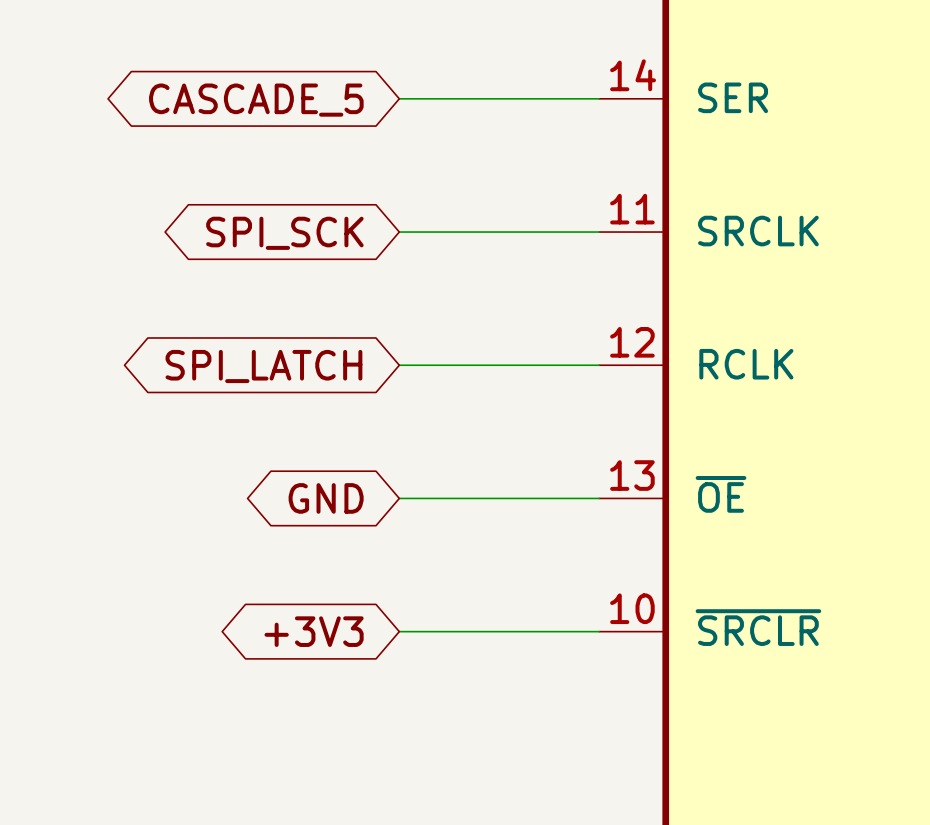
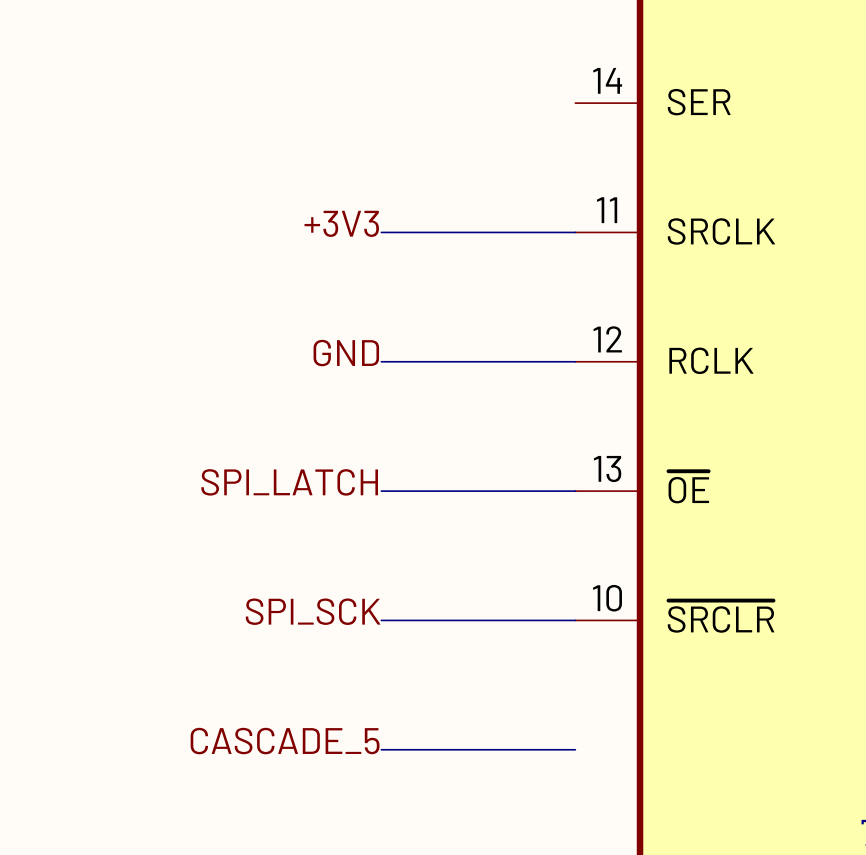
wire: (399, 98) (599, 98) -> none
global label: CASCADE_5 (256, 100) -> none
label: none -> +3V3 (341, 223)
global label: SPI_SCK (284, 233) -> none
label: none -> GND (346, 353)
global label: SPI_LATCH (263, 366) -> none
label: none -> SPI_LATCH (289, 482)
global label: GND (326, 498) -> none
label: none -> SPI_SCK (313, 611)
global label: +3V3 (314, 631) -> none
label: none -> CASCADE_5 (285, 741)
wire: none -> (381, 749) (575, 749)

